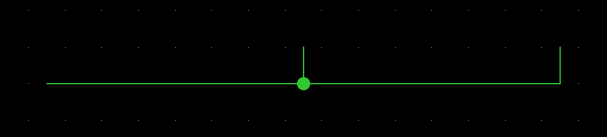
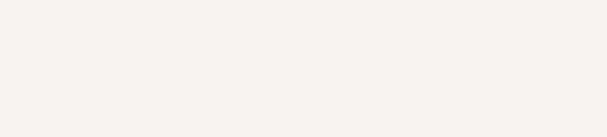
wire: (303, 47) (303, 83) -> none
wire: (560, 47) (560, 83) (47, 83) -> none
junction: (303, 83) -> none

